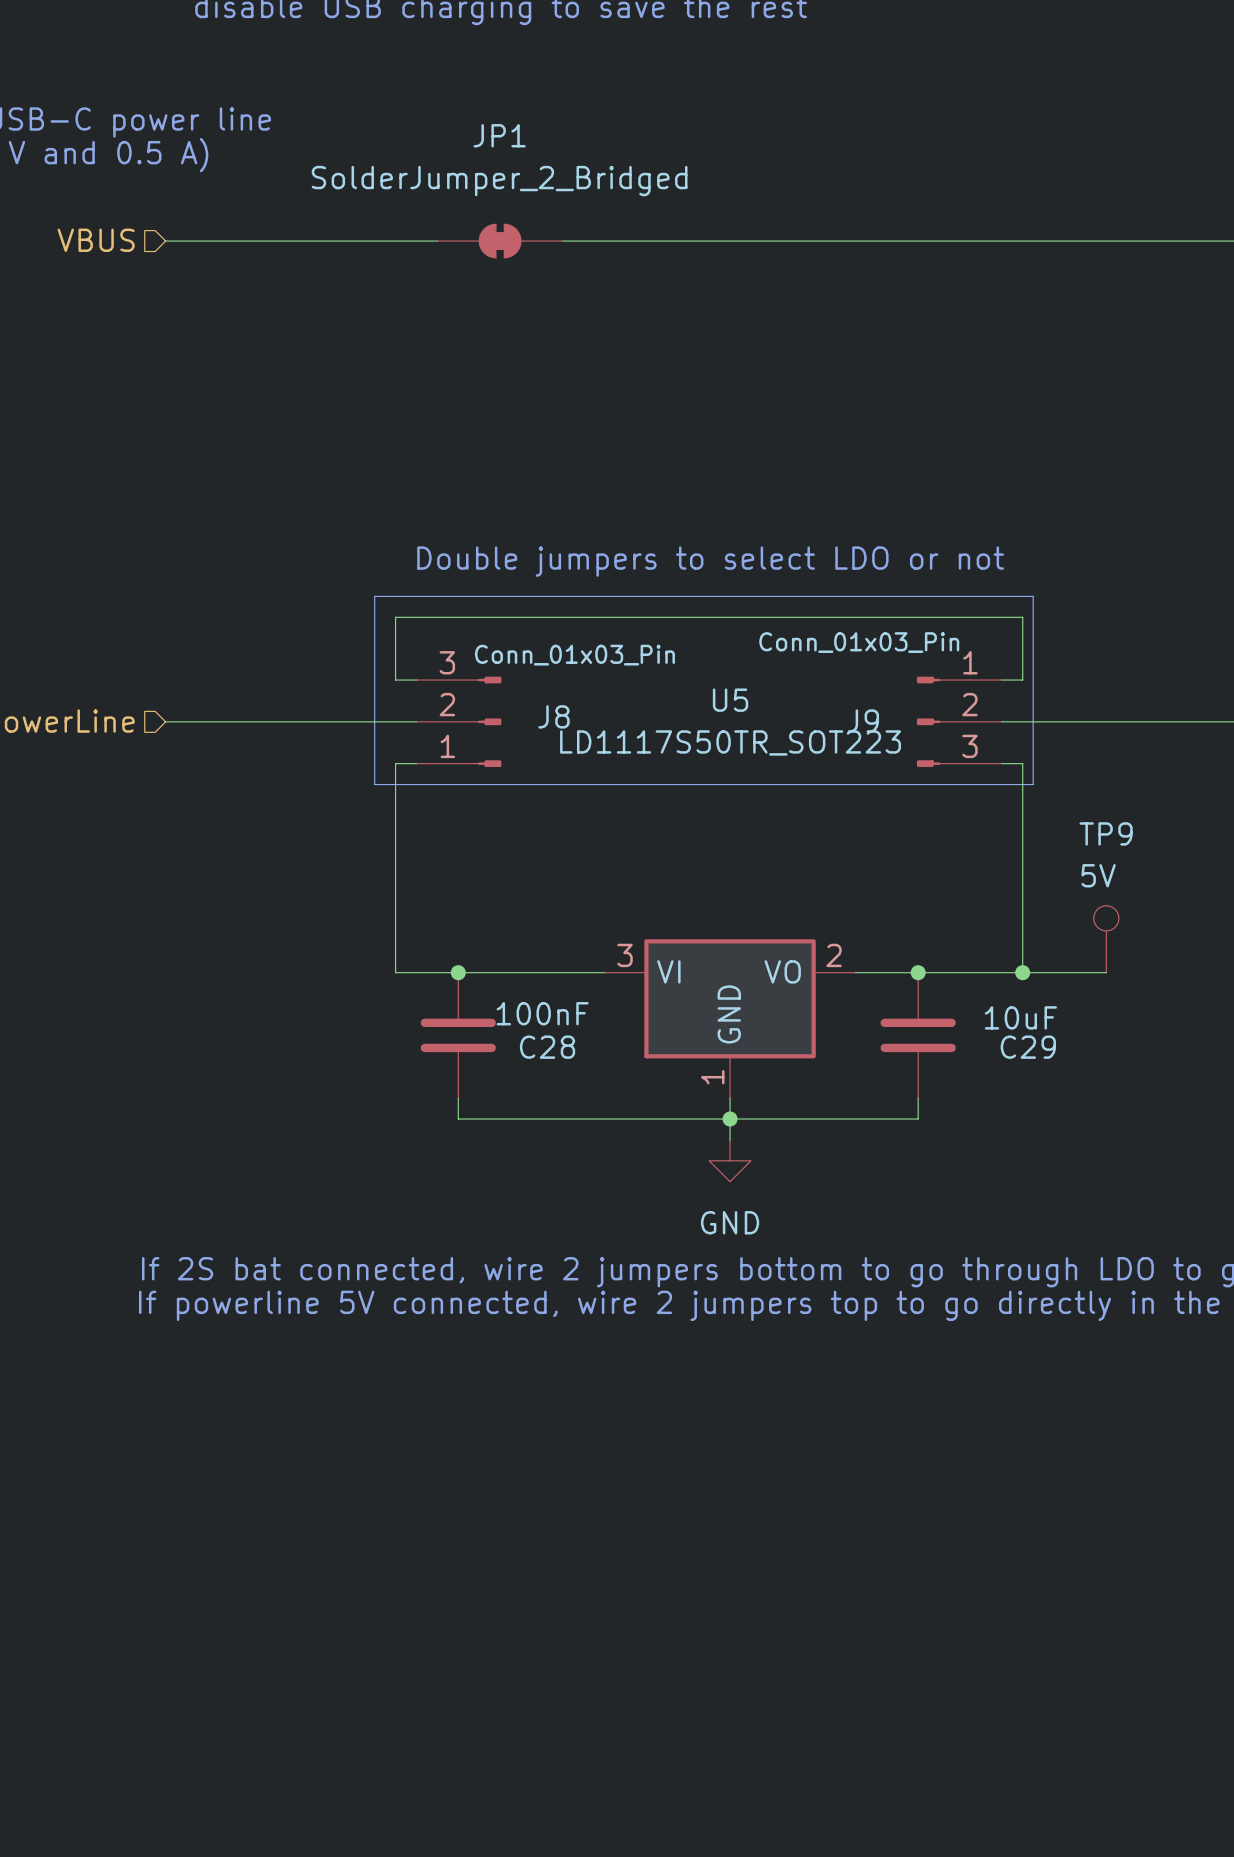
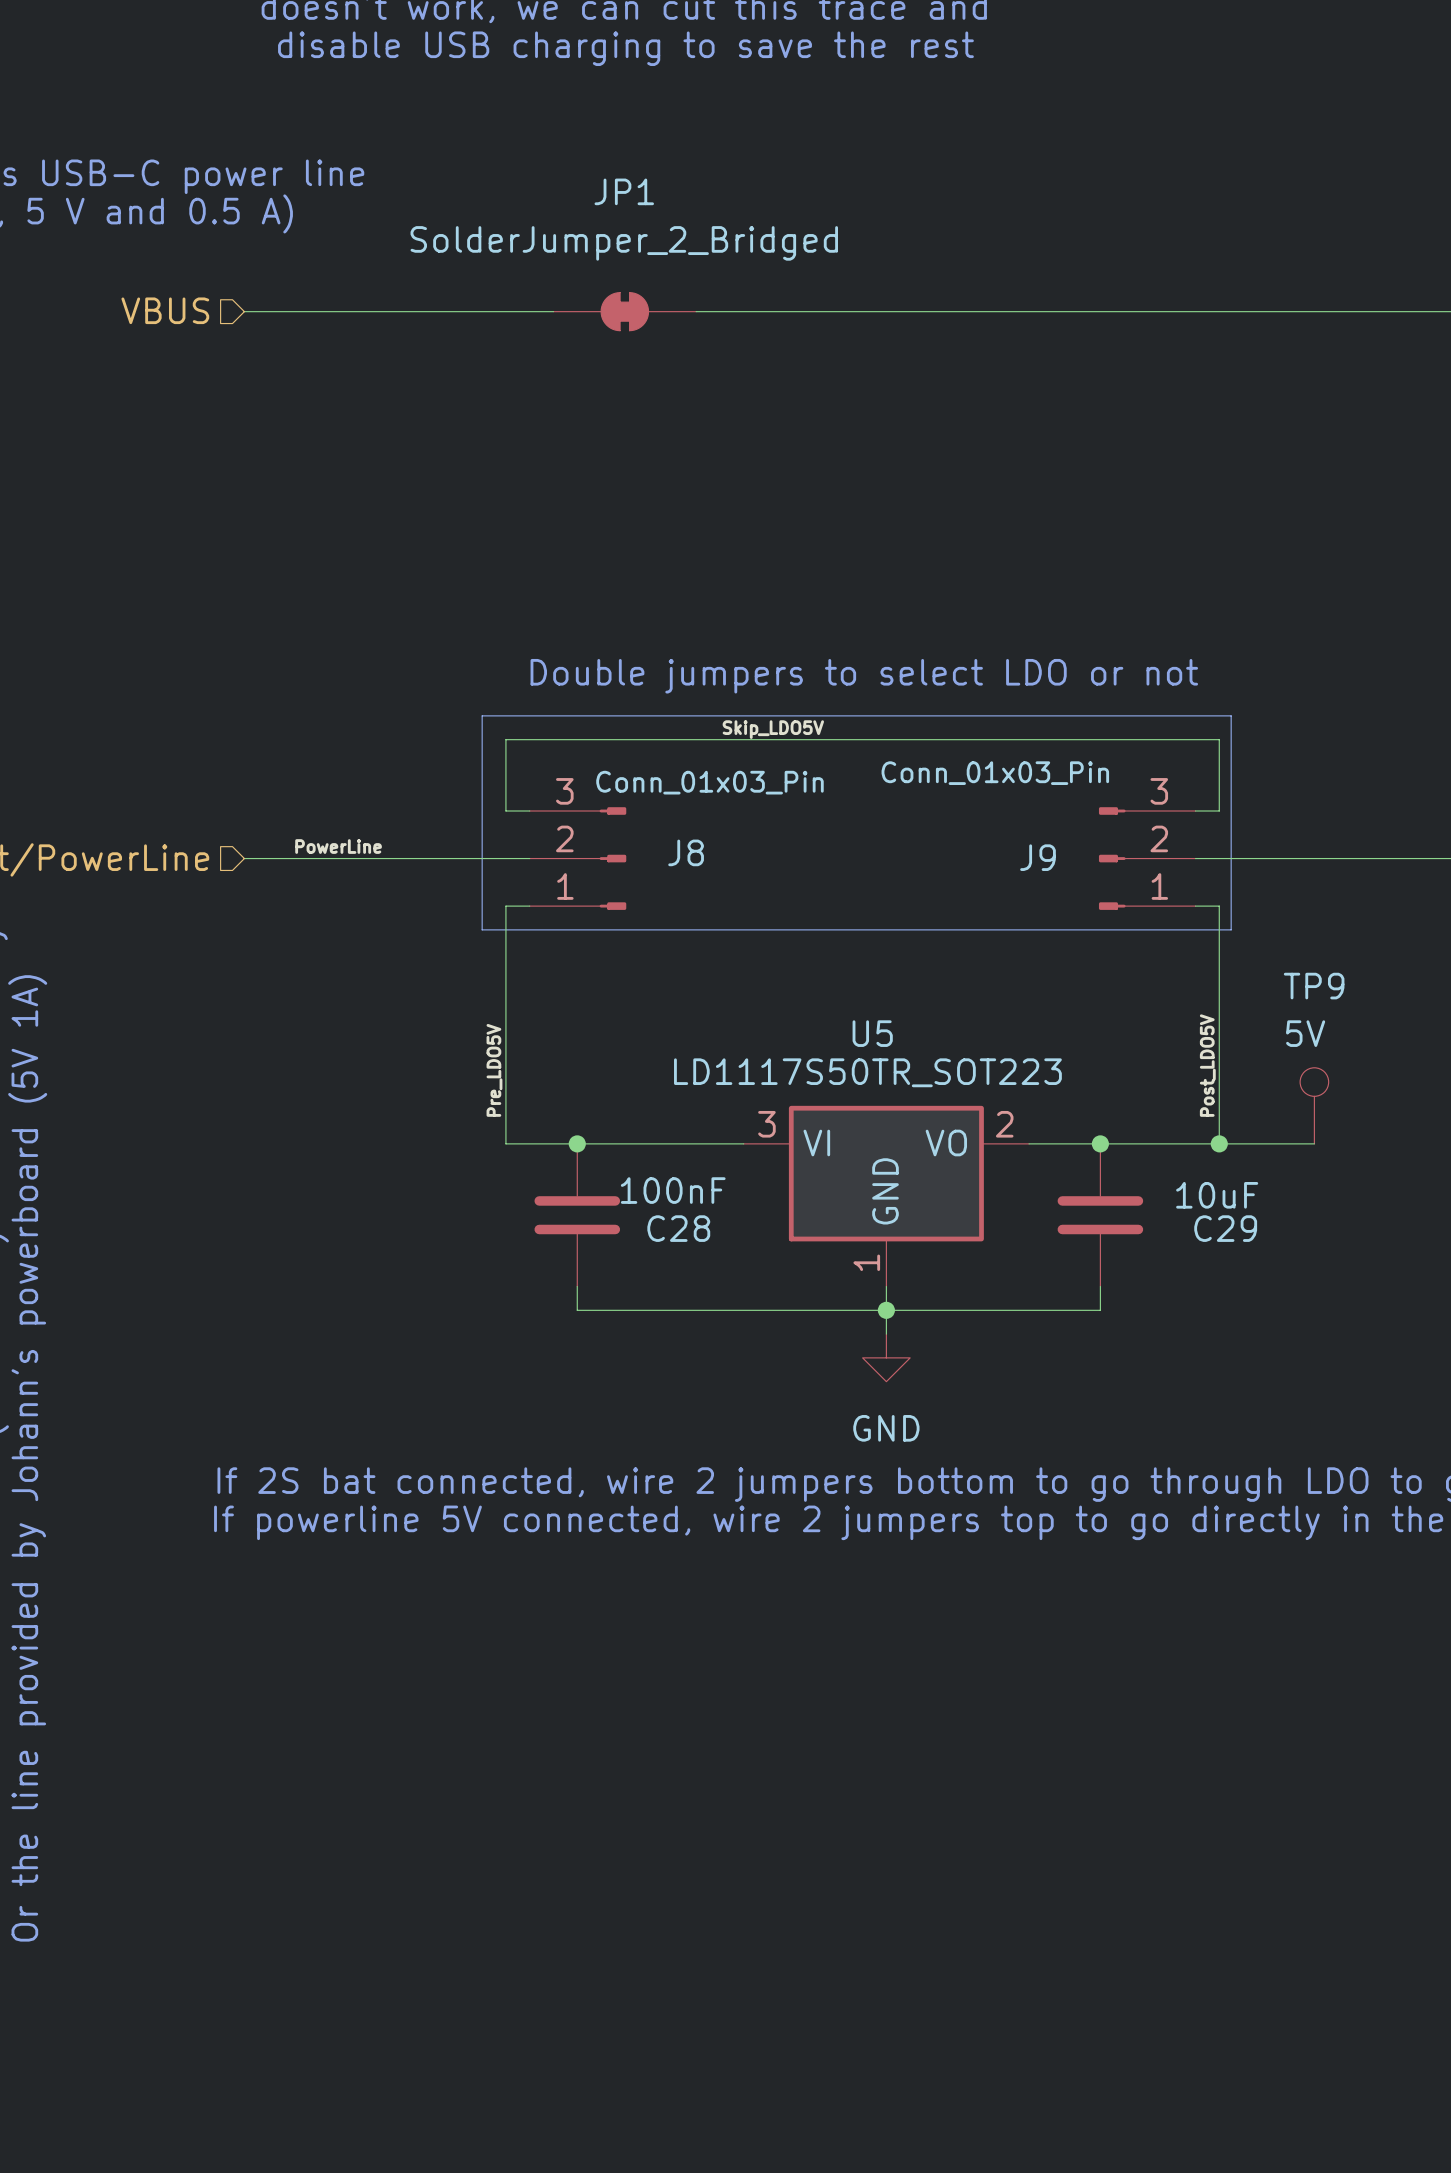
label: none -> Skip_LDO5V (773, 729)
J9 value position: Conn_01x03_Pin (859, 642) -> Conn_01x03_Pin (995, 773)
U5 name position: U5 (730, 700) -> U5 (872, 1033)
label: none -> PowerLine (338, 846)
J9 flip: as is (928, 721) -> up-down (1112, 858)
U5 value position: LD1117S50TR_SOT223 (730, 742) -> LD1117S50TR_SOT223 (867, 1072)
label: none -> Post_LDO5V (1207, 1065)
label: none -> Pre_LDO5V (494, 1070)

